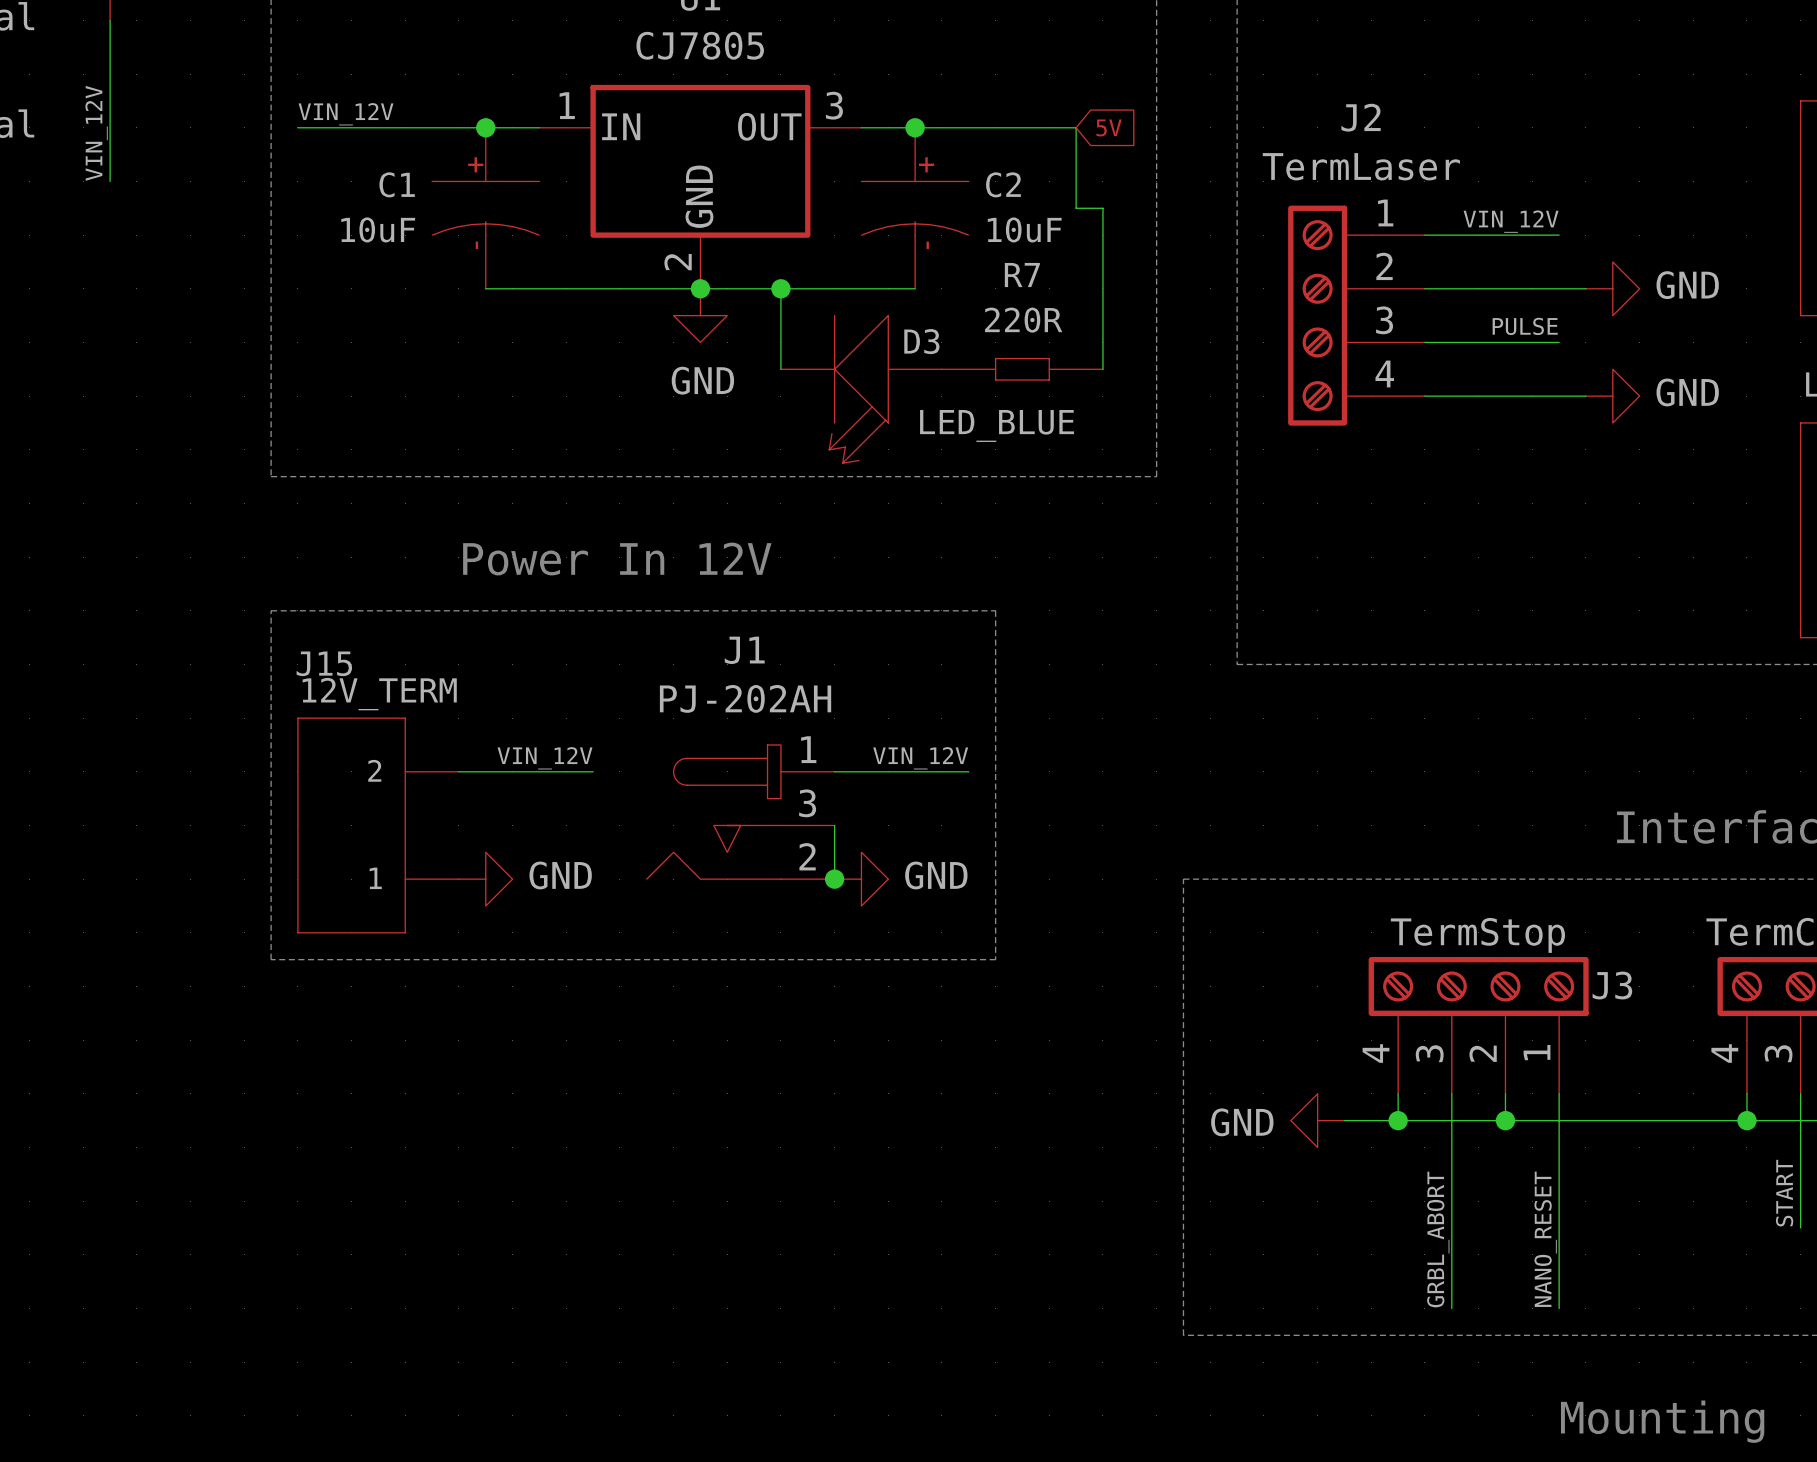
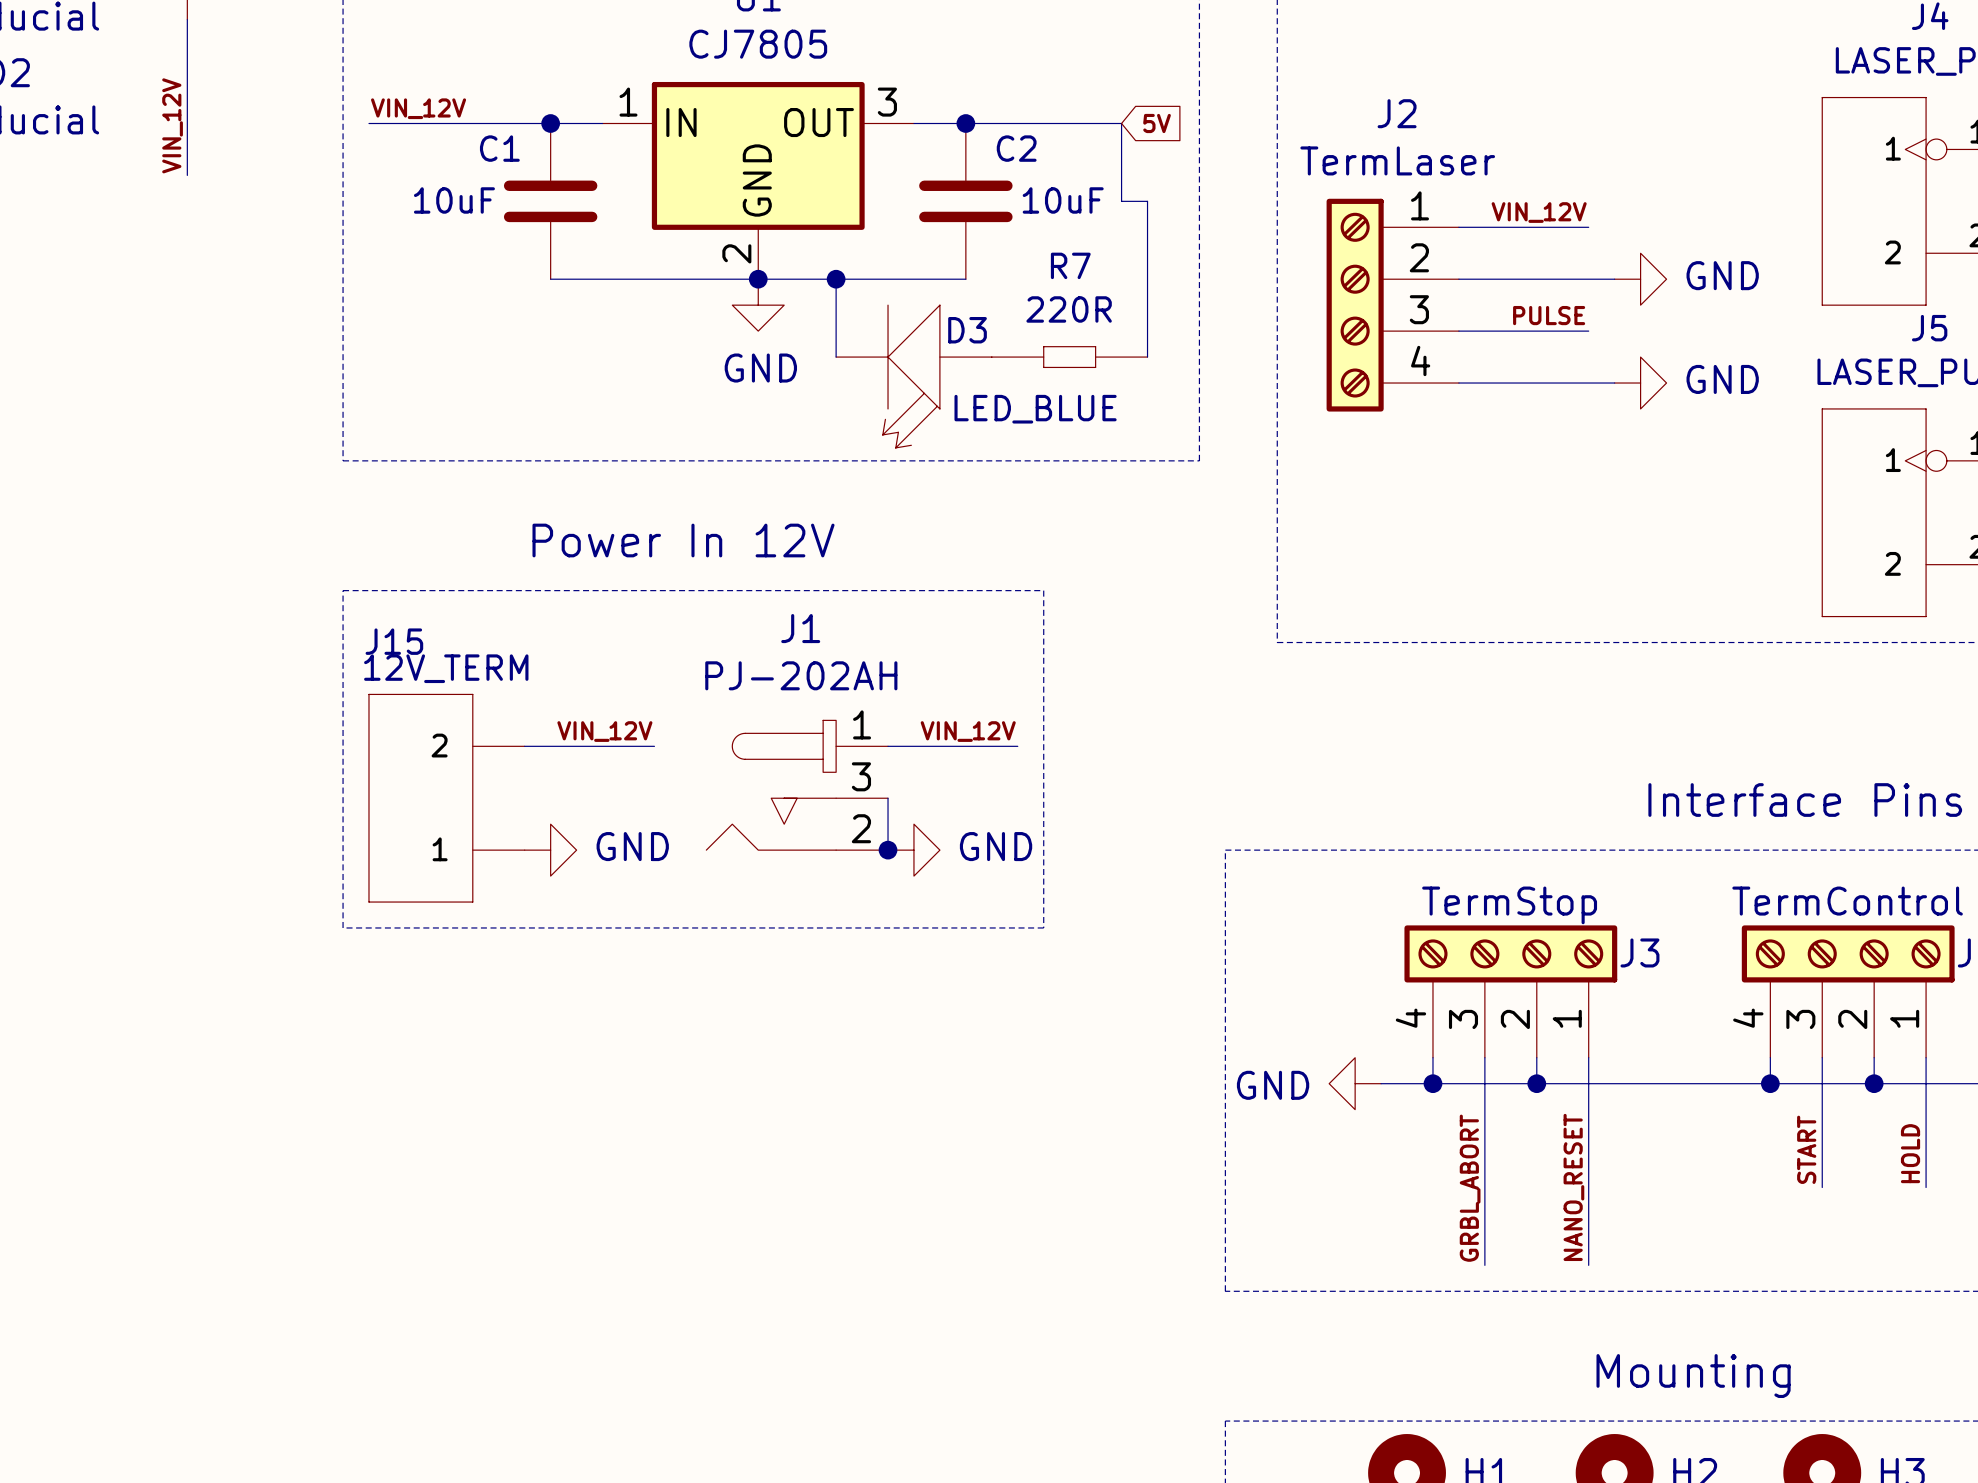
C1 symbol: [432, 127, 540, 289] -> [503, 123, 598, 280]
C2 symbol: [861, 127, 969, 289] -> [919, 123, 1013, 280]
C1 name position: C1 (397, 184) -> C1 (499, 148)
C2 name position: C2 (1003, 184) -> C2 (1016, 148)

